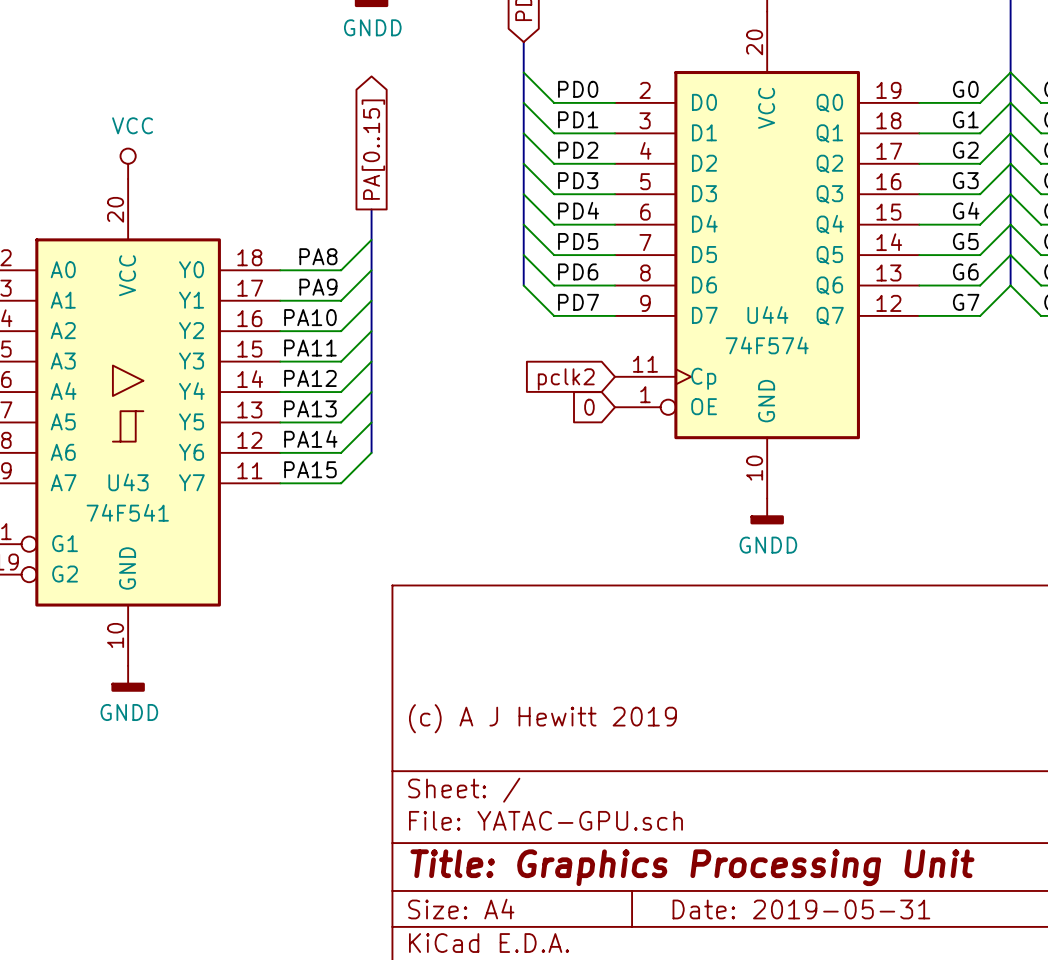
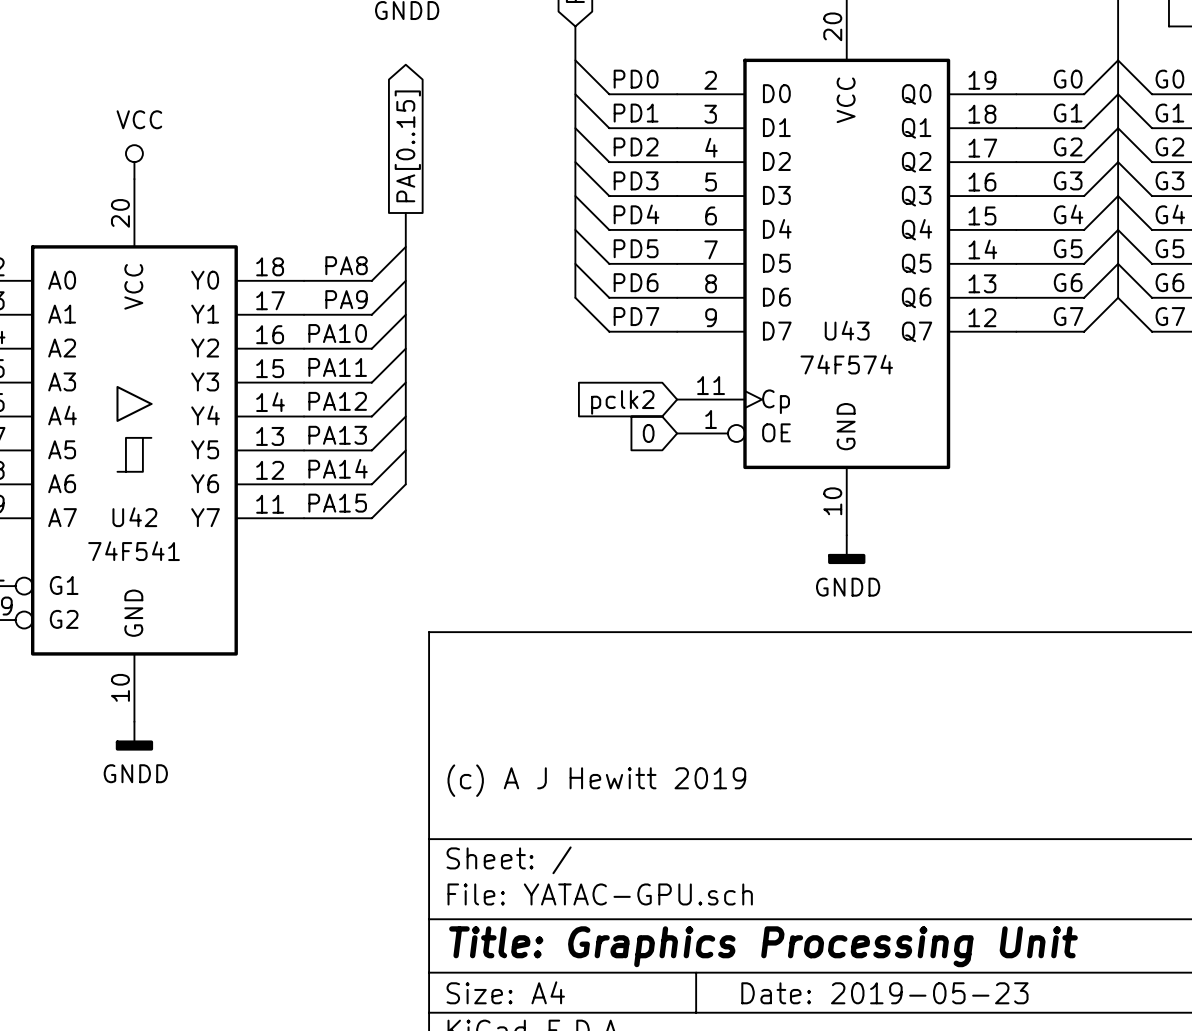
U44 name: U44 (767, 315) -> U43 (847, 330)
U43 name: U43 (128, 482) -> U42 (134, 517)
title block: Date: 2019-05-31 (801, 909) -> Date: 2019-05-23 (884, 993)

